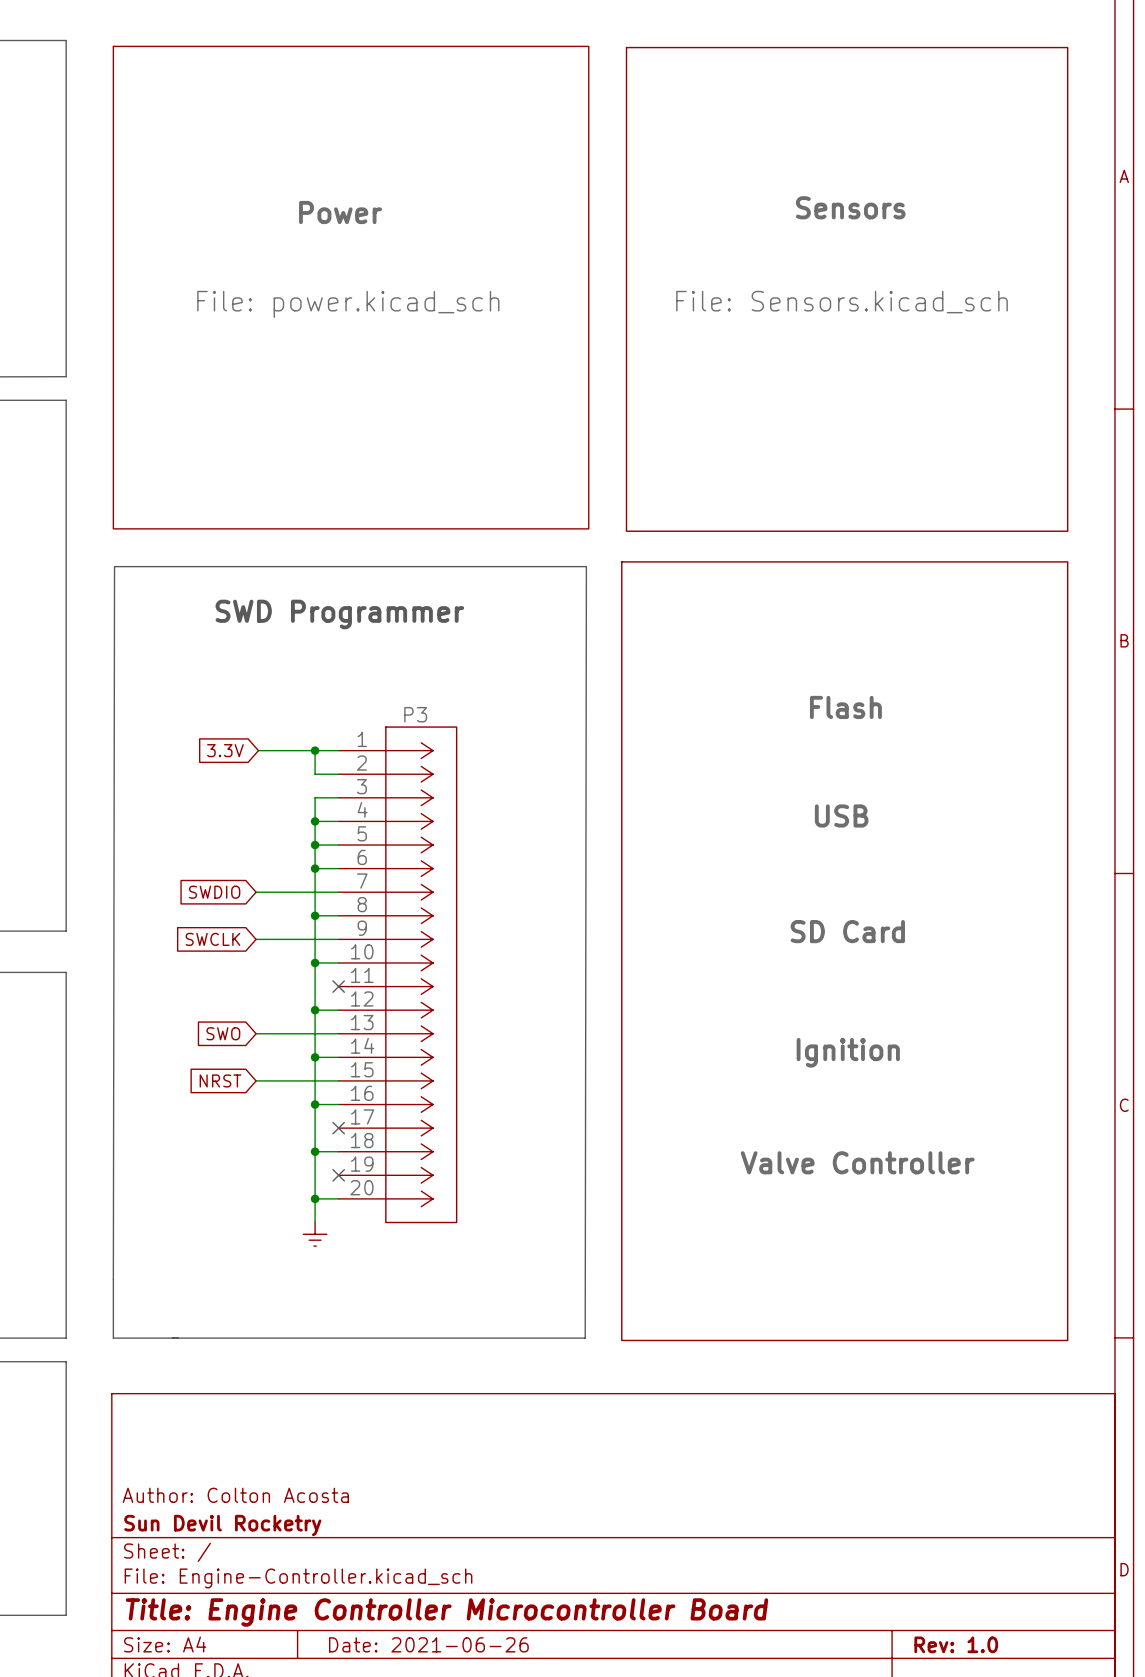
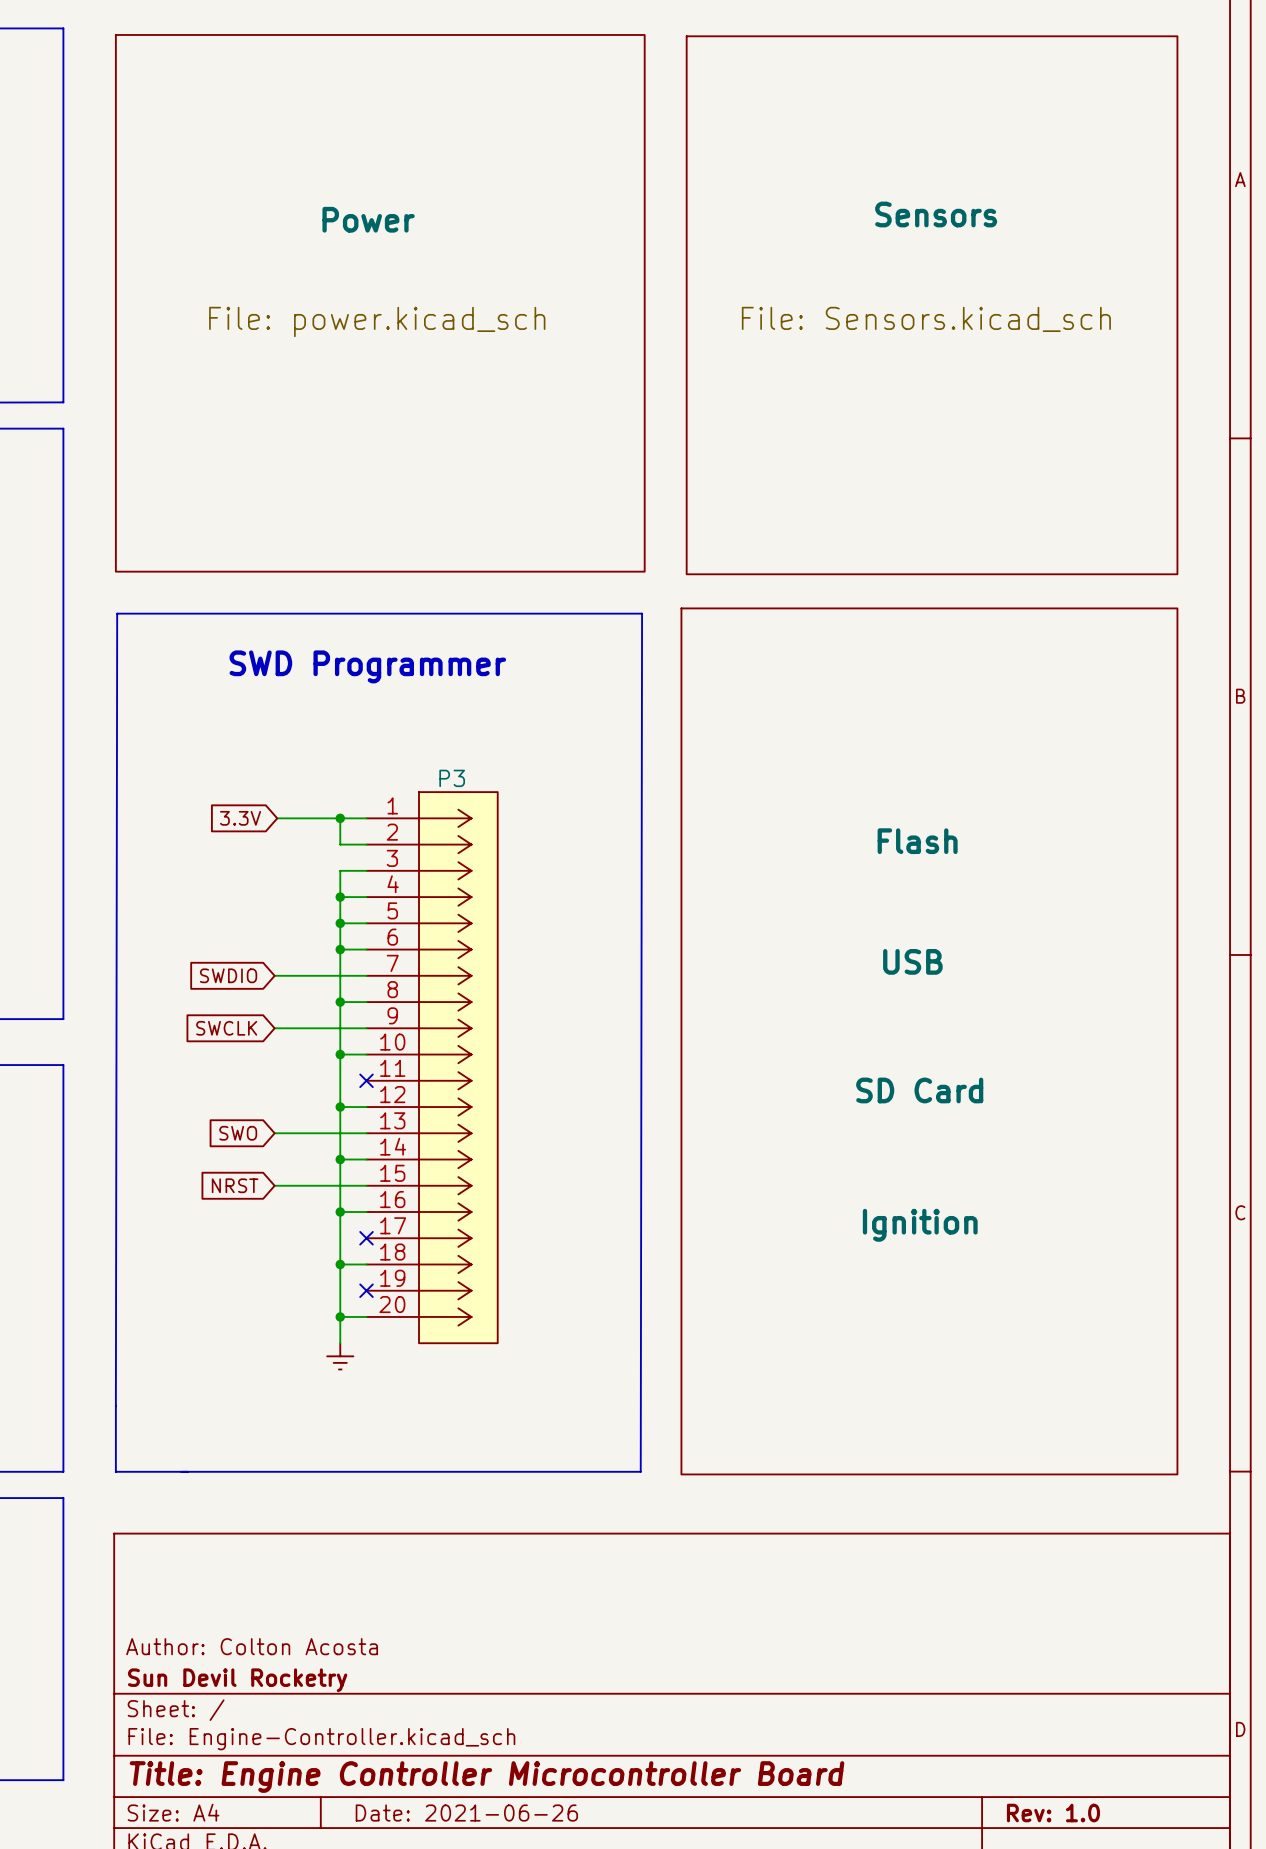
sheet text position: Flash (845, 707) -> Flash (917, 841)
sheet text position: USB (841, 815) -> USB (912, 961)
sheet text position: SD Card (847, 931) -> SD Card (919, 1090)
sheet text position: Ignition (848, 1052) -> Ignition (920, 1225)
sheet text: Valve Controller (857, 1162) -> none

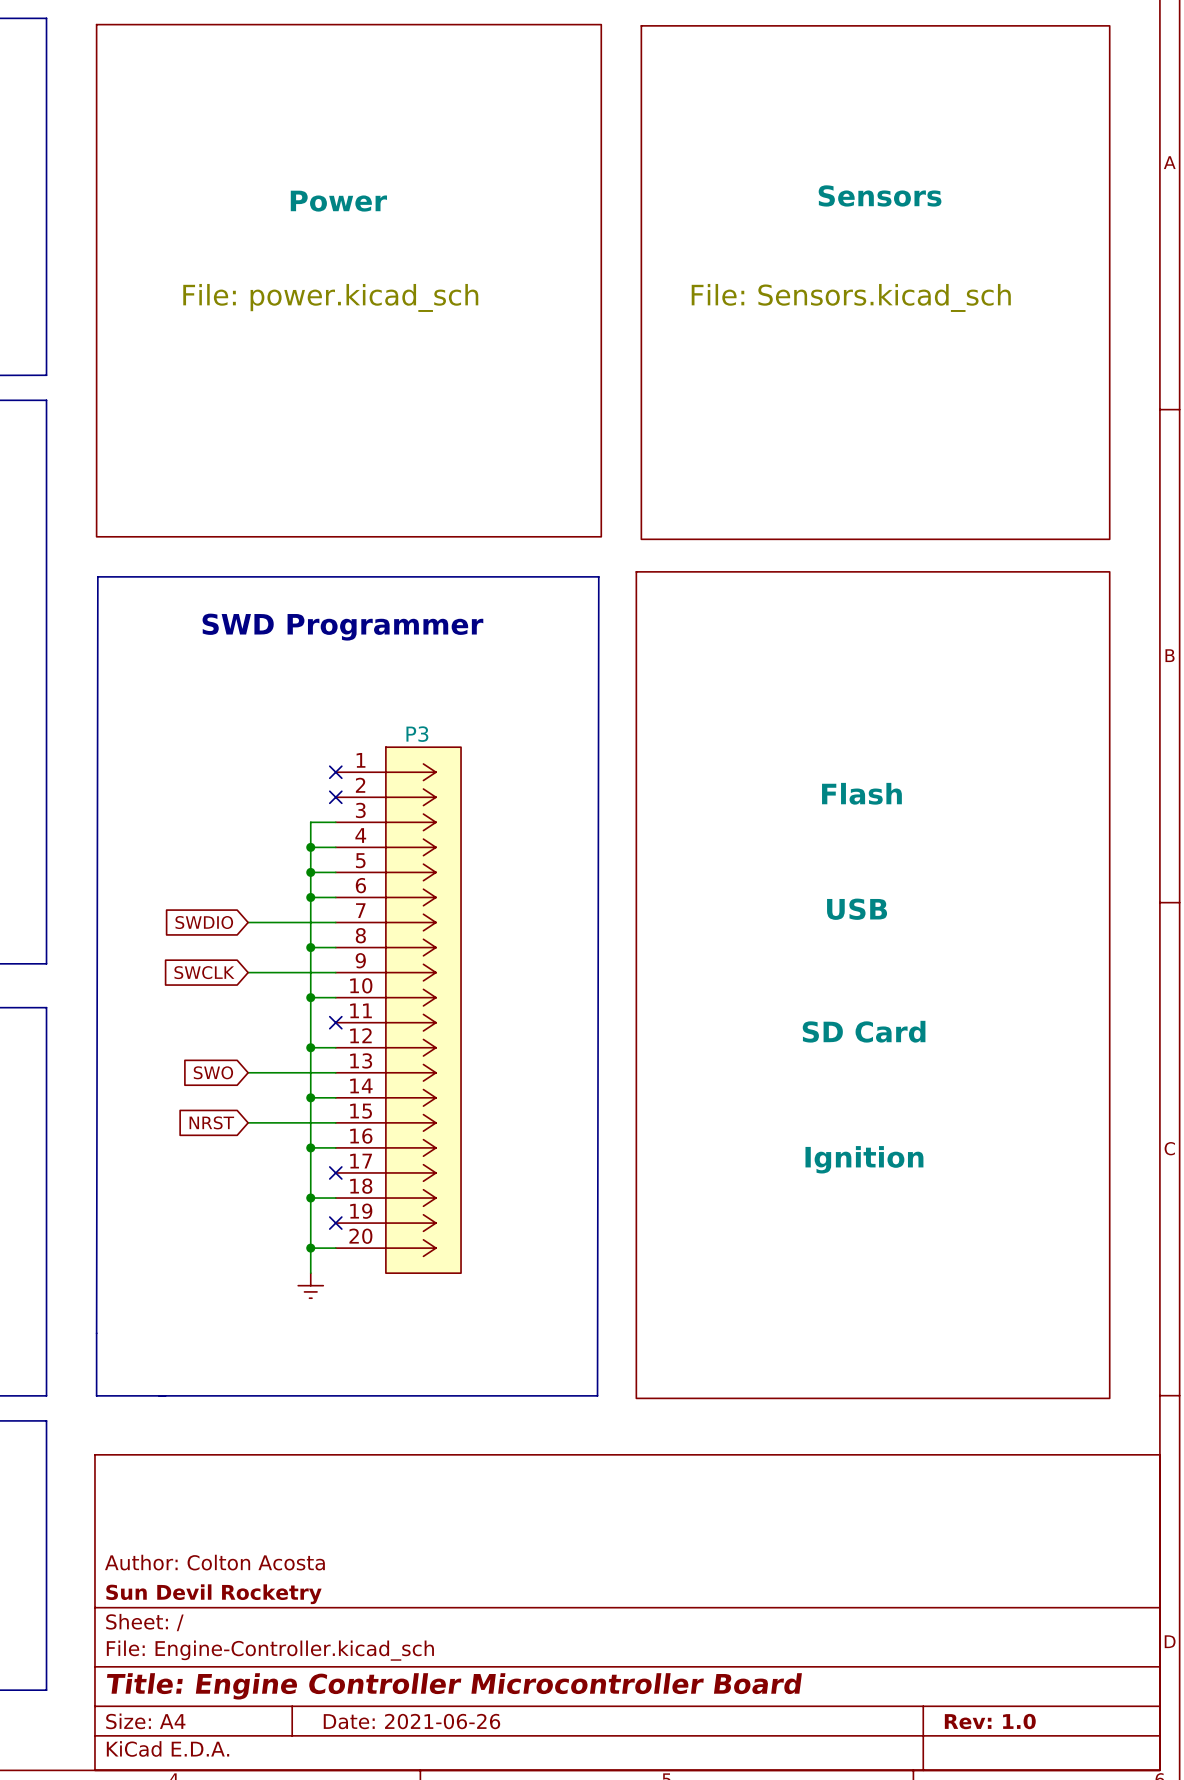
global label: 3.3V (240, 818) -> none
wire: (277, 818) (366, 818) -> none
wire: (340, 818) (340, 844) (366, 844) -> none
junction: (340, 818) -> none
no-connect mark: none -> (335, 772)
no-connect mark: none -> (335, 797)

